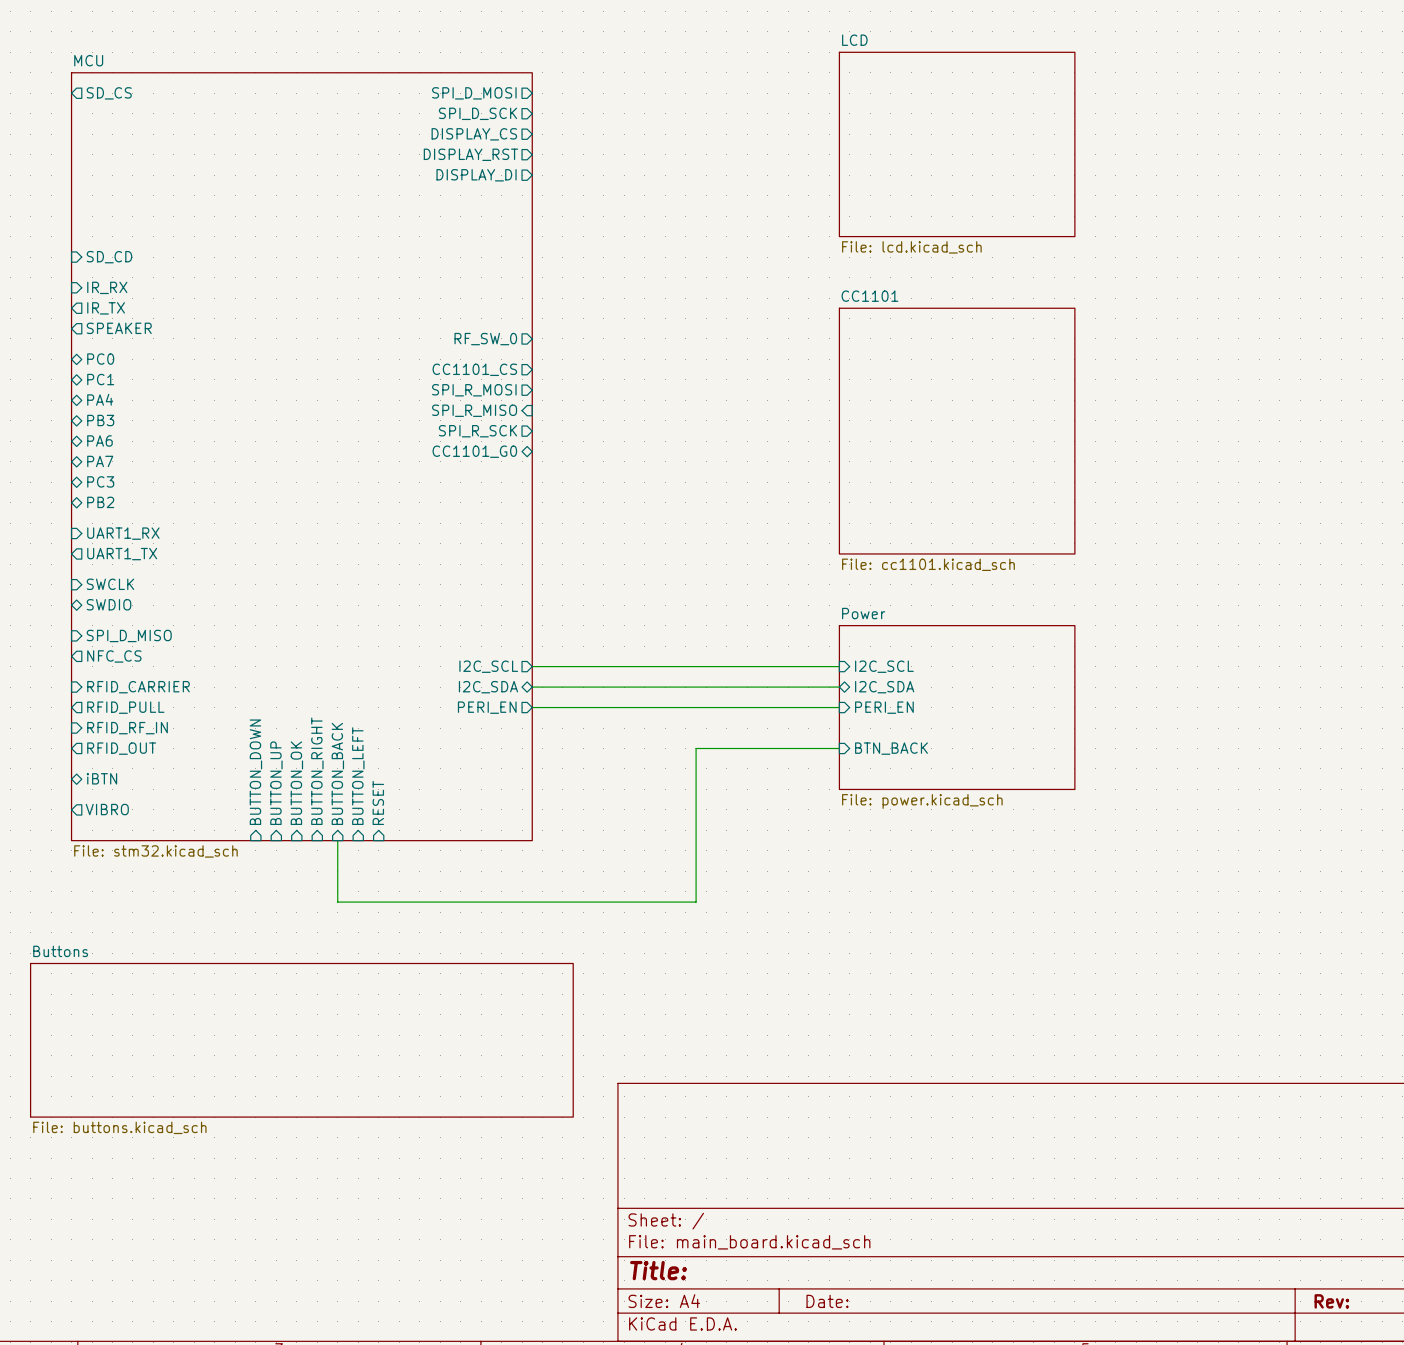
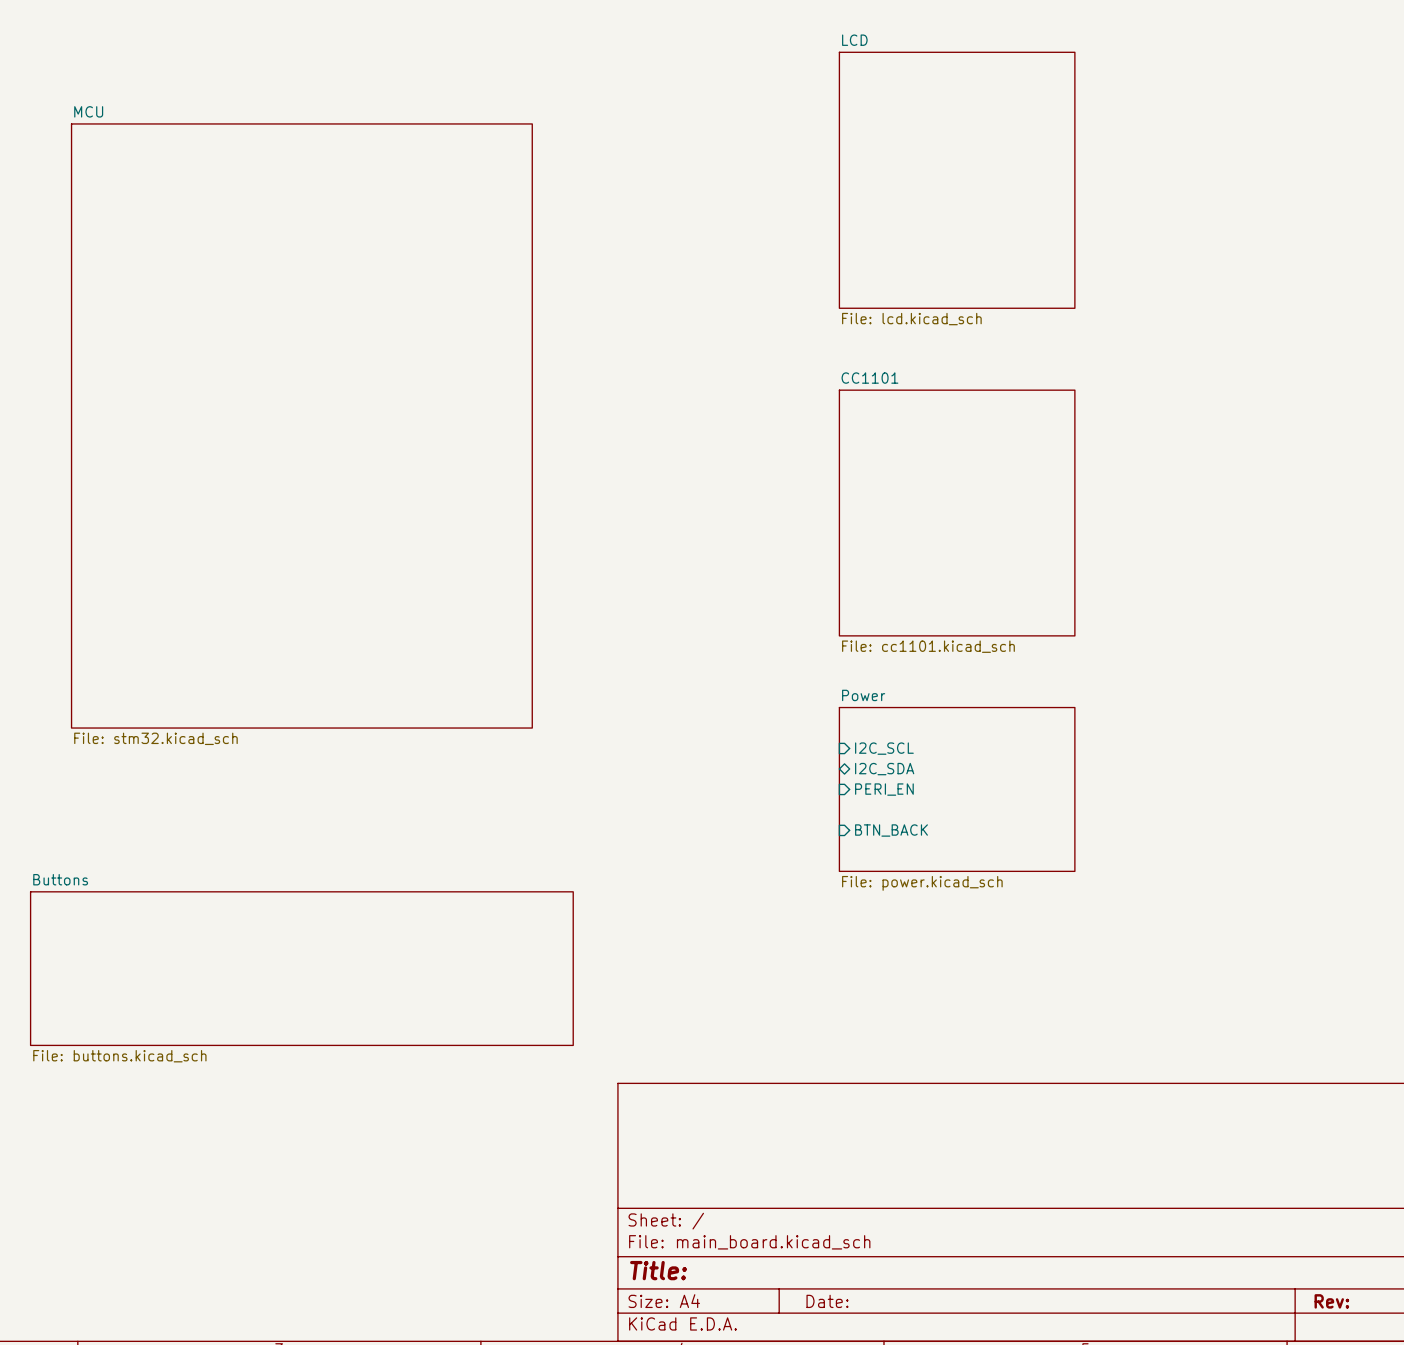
sheet pin: SD_CS (109, 93) -> none
sheet pin: SPI_D_MOSI (474, 93) -> none
sheet pin: SPI_D_SCK (477, 113) -> none
sheet pin: DISPLAY_CS (474, 134) -> none
sheet LCD: File: lcd.kicad_sch (957, 144) -> none
sheet pin: DISPLAY_RST (470, 154) -> none
sheet pin: DISPLAY_DI (476, 175) -> none
sheet LCD: none -> File: lcd.kicad_sch (957, 180)
sheet pin: SD_CD (109, 257) -> none
sheet pin: IR_RX (107, 287) -> none
sheet pin: IR_TX (106, 308) -> none
sheet pin: SPEAKER (119, 328) -> none
sheet pin: RF_SW_0 (485, 339) -> none
sheet pin: PC0 (100, 359) -> none
sheet pin: CC1101_CS (474, 369) -> none
sheet pin: PC1 (100, 379) -> none
sheet pin: SPI_R_MOSI (474, 390) -> none
sheet pin: PA4 (100, 399) -> none
sheet pin: SPI_R_MISO (474, 410) -> none
sheet pin: PB3 (100, 420) -> none
sheet MCU: none -> File: stm32.kicad_sch (301, 425)
sheet pin: SPI_R_SCK (477, 431) -> none
sheet CC1101 position: (957, 431) -> (957, 513)
sheet pin: PA6 (99, 440) -> none
sheet pin: CC1101_G0 (474, 451) -> none
sheet MCU: File: stm32.kicad_sch (301, 456) -> none
sheet pin: PA7 (100, 461) -> none
sheet pin: PC3 (100, 481) -> none
sheet pin: PB2 (100, 502) -> none
sheet pin: UART1_RX (123, 533) -> none
sheet pin: UART1_TX (122, 554) -> none
sheet pin: SWCLK (110, 584) -> none
sheet pin: SWDIO (109, 604) -> none
sheet pin: SPI_D_MISO (129, 635) -> none
sheet pin: NFC_CS (114, 656) -> none
sheet pin: I2C_SCL (488, 666) -> none
wire: (532, 666) (839, 666) -> none
sheet pin: I2C_SCL (884, 666) -> none
sheet pin: RFID_CARRIER (138, 687) -> none
sheet pin: I2C_SDA (488, 687) -> none
wire: (532, 687) (839, 687) -> none
sheet pin position: I2C_SDA (884, 687) -> I2C_SDA (884, 769)
sheet pin: RFID_PULL (125, 707) -> none
sheet pin: PERI_EN (487, 707) -> none
wire: (532, 707) (839, 707) -> none
sheet pin position: PERI_EN (884, 707) -> PERI_EN (884, 789)
sheet Power position: (957, 707) -> (957, 789)
sheet pin: RFID_RF_IN (127, 728) -> none
sheet pin: RFID_OUT (121, 748) -> none
wire: (839, 748) (696, 748) (696, 902) (337, 902) (337, 840) -> none
sheet pin: BTN_BACK (891, 748) -> I2C_SCL (884, 748)
sheet pin: BUTTON_RIGHT (317, 771) -> none
sheet pin: BUTTON_DOWN (255, 772) -> none
sheet pin: BUTTON_BACK (337, 773) -> none
sheet pin: BUTTON_LEFT (358, 776) -> none
sheet pin: iBTN (101, 778) -> none
sheet pin: BUTTON_UP (276, 783) -> none
sheet pin: BUTTON_OK (296, 783) -> none
sheet pin: RESET (378, 802) -> none
sheet pin: VIBRO (107, 809) -> none
sheet pin: none -> BTN_BACK (891, 830)
sheet Buttons position: (301, 1040) -> (301, 968)

